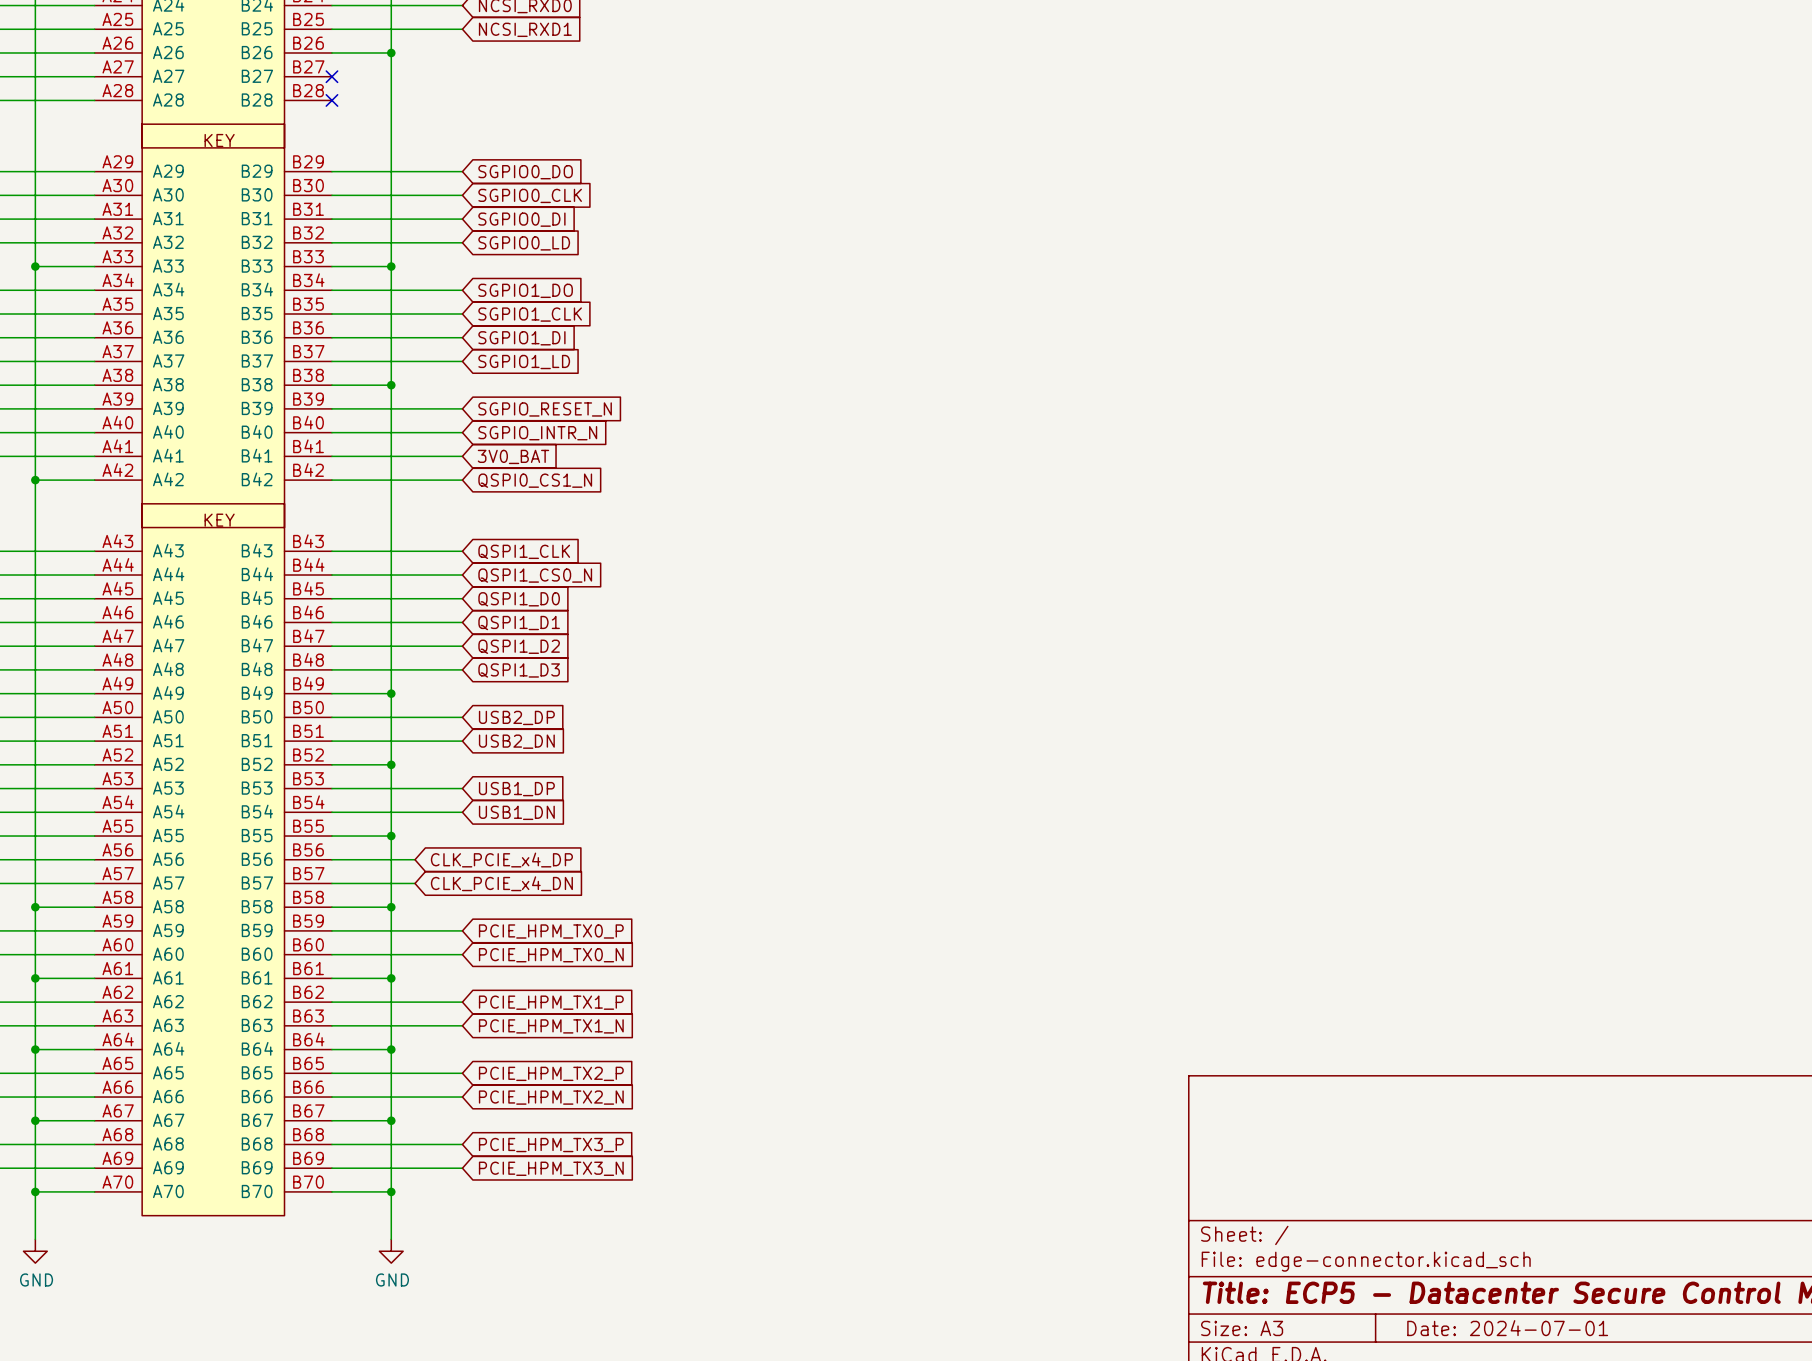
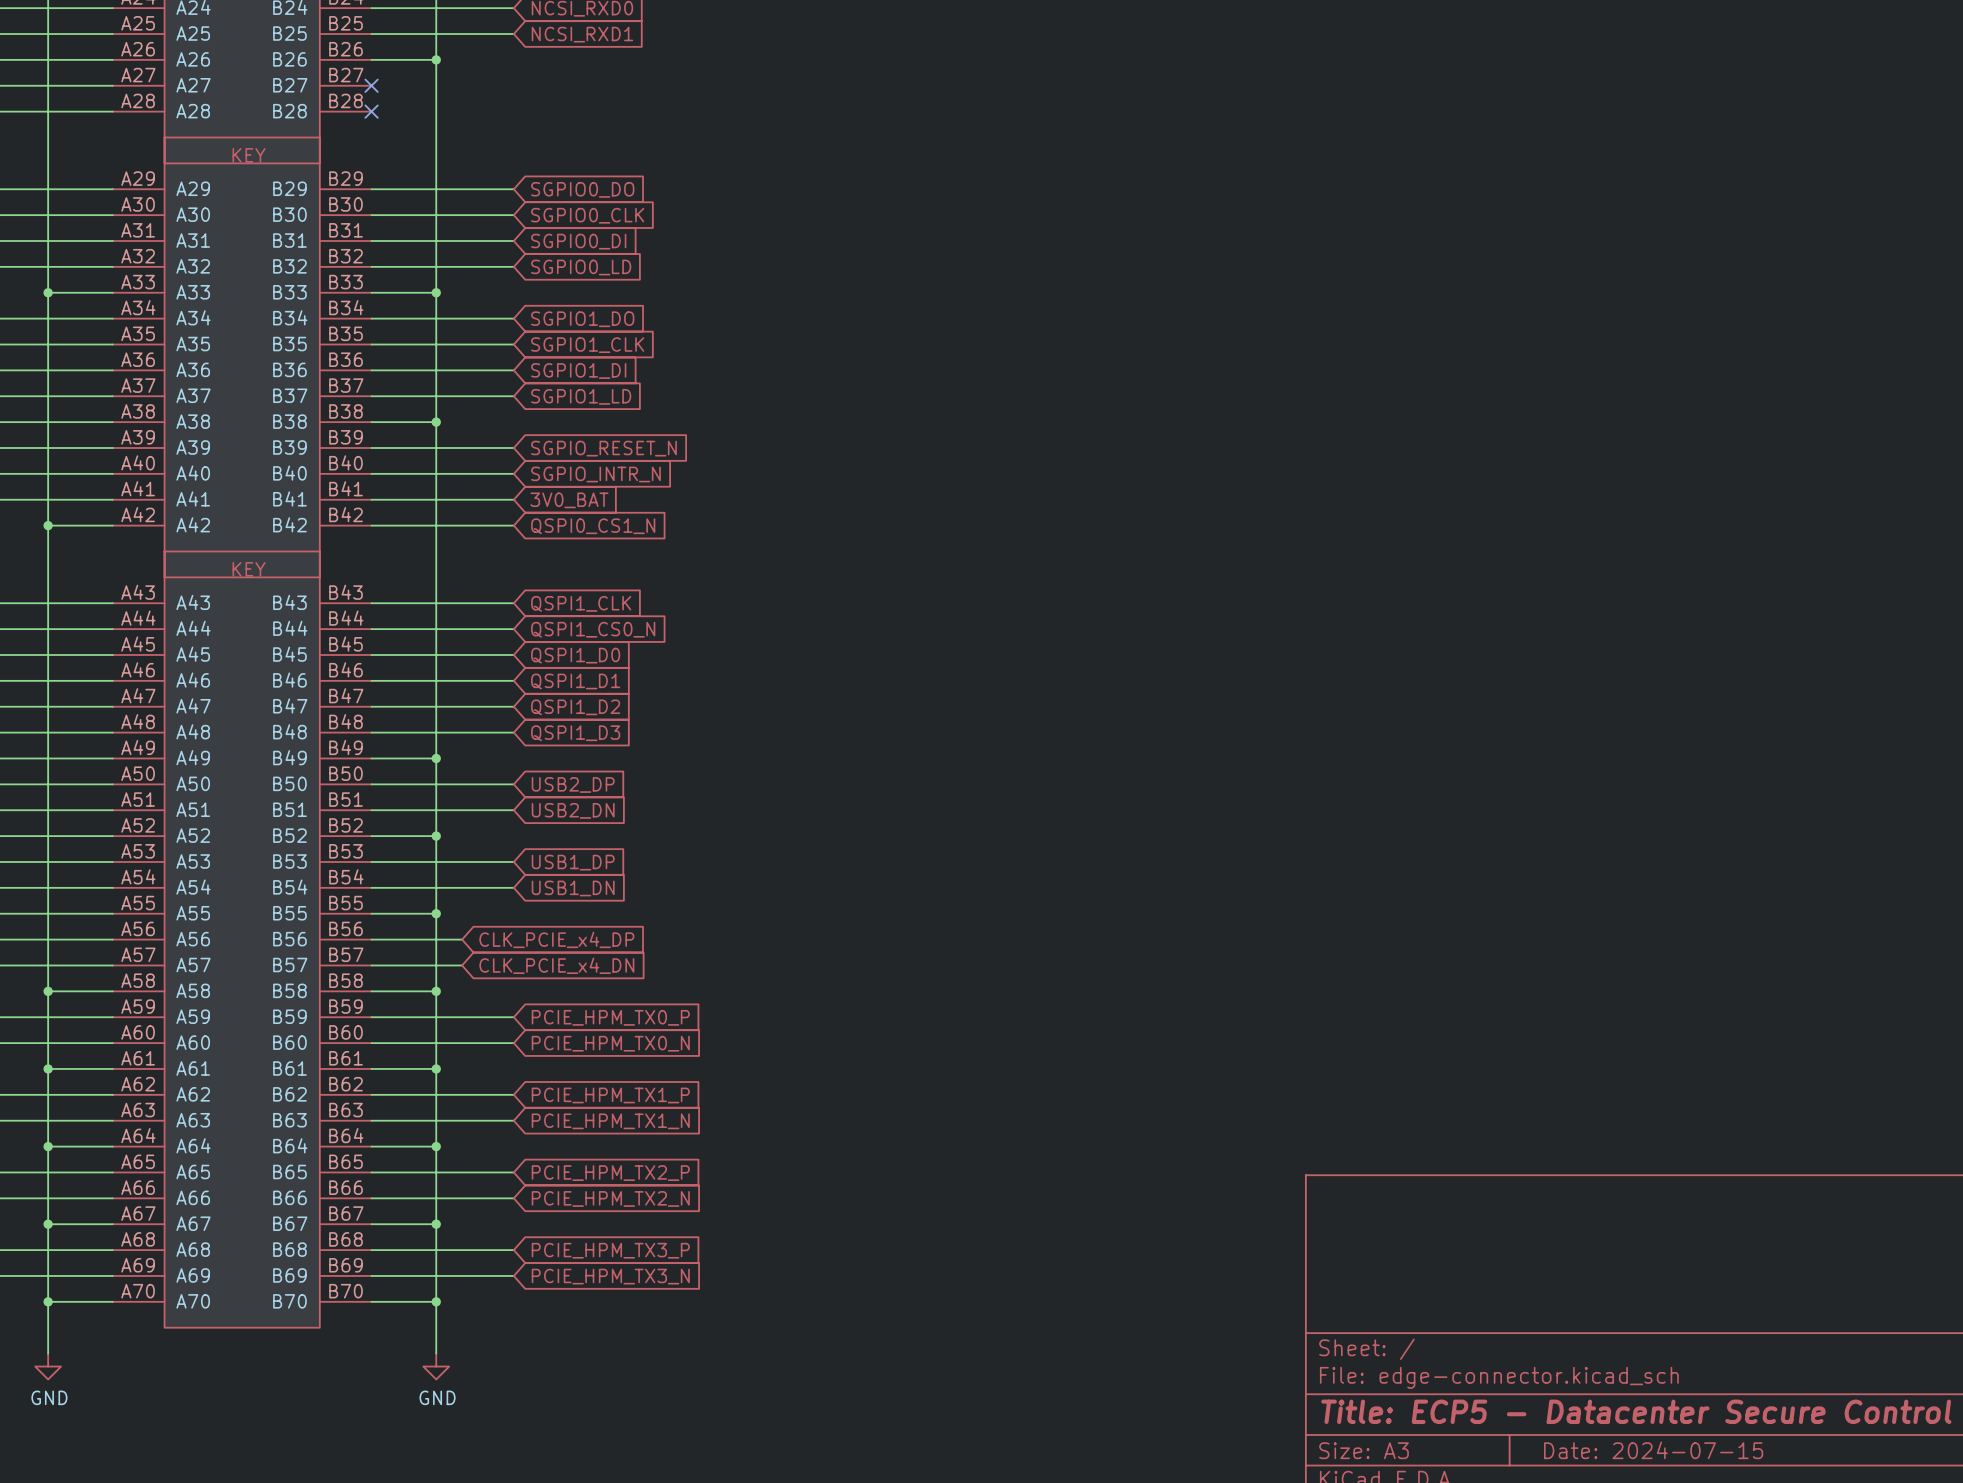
title block: Date: 2024-07-01 (1507, 1328) -> Date: 2024-07-15 (1653, 1450)

